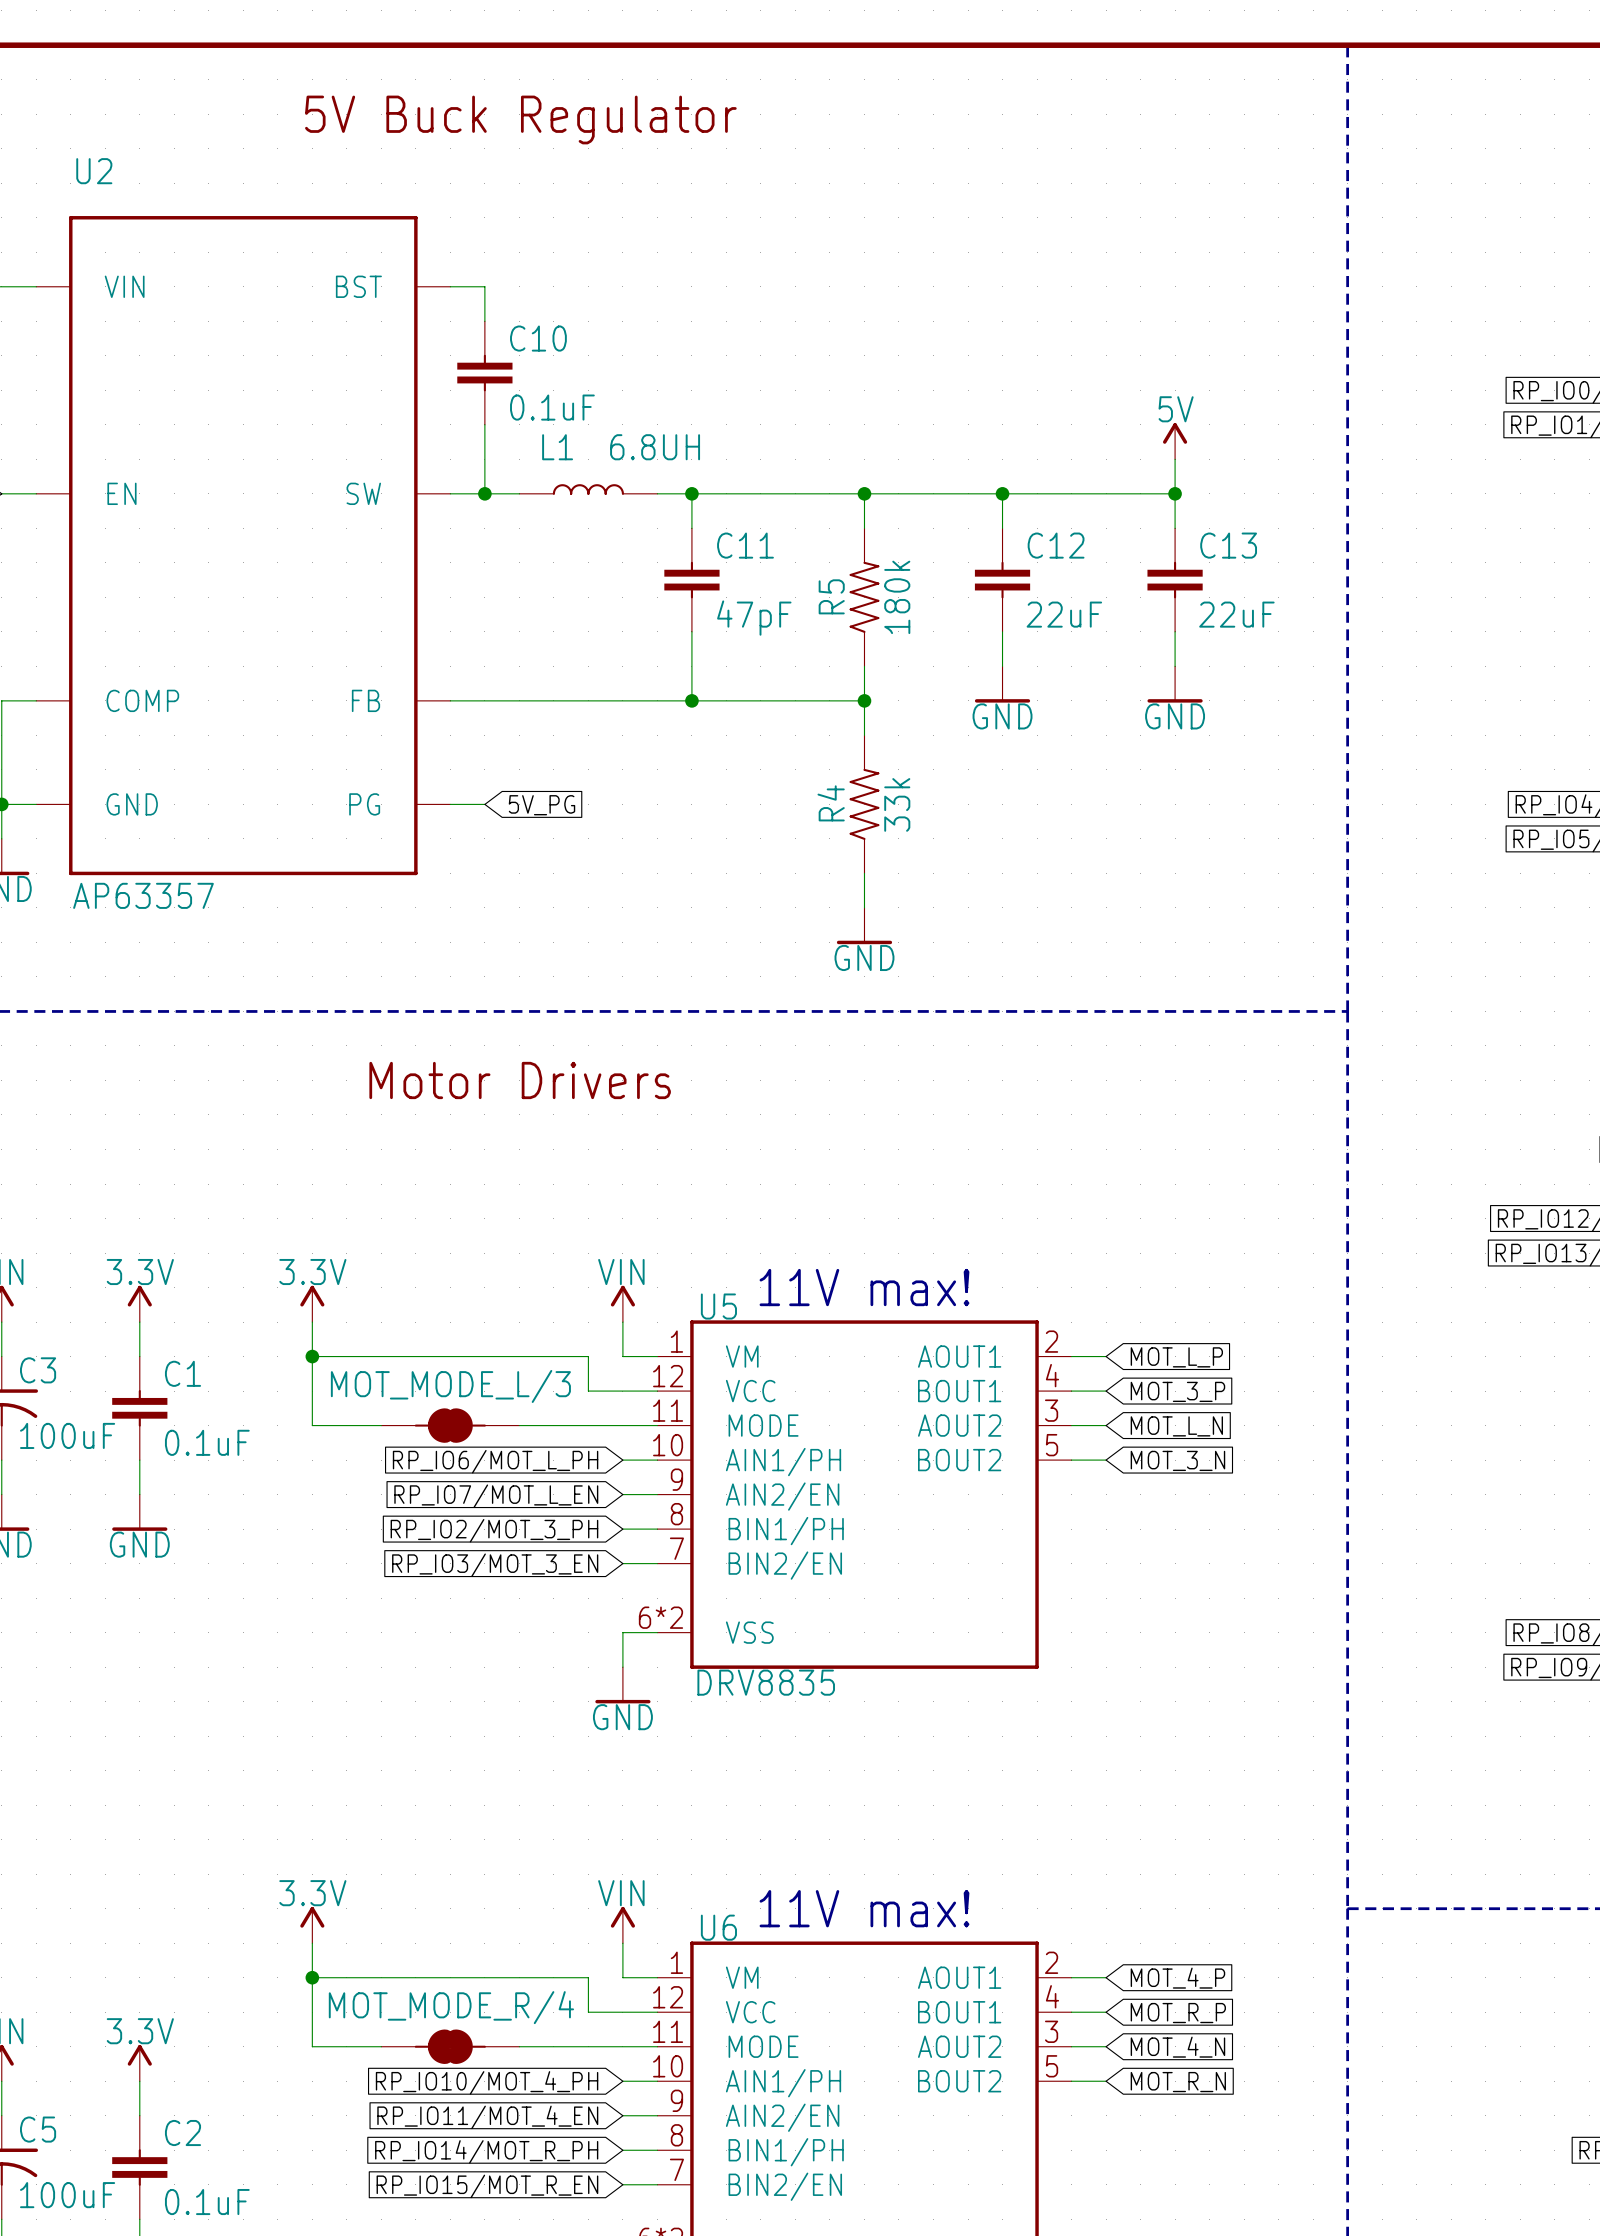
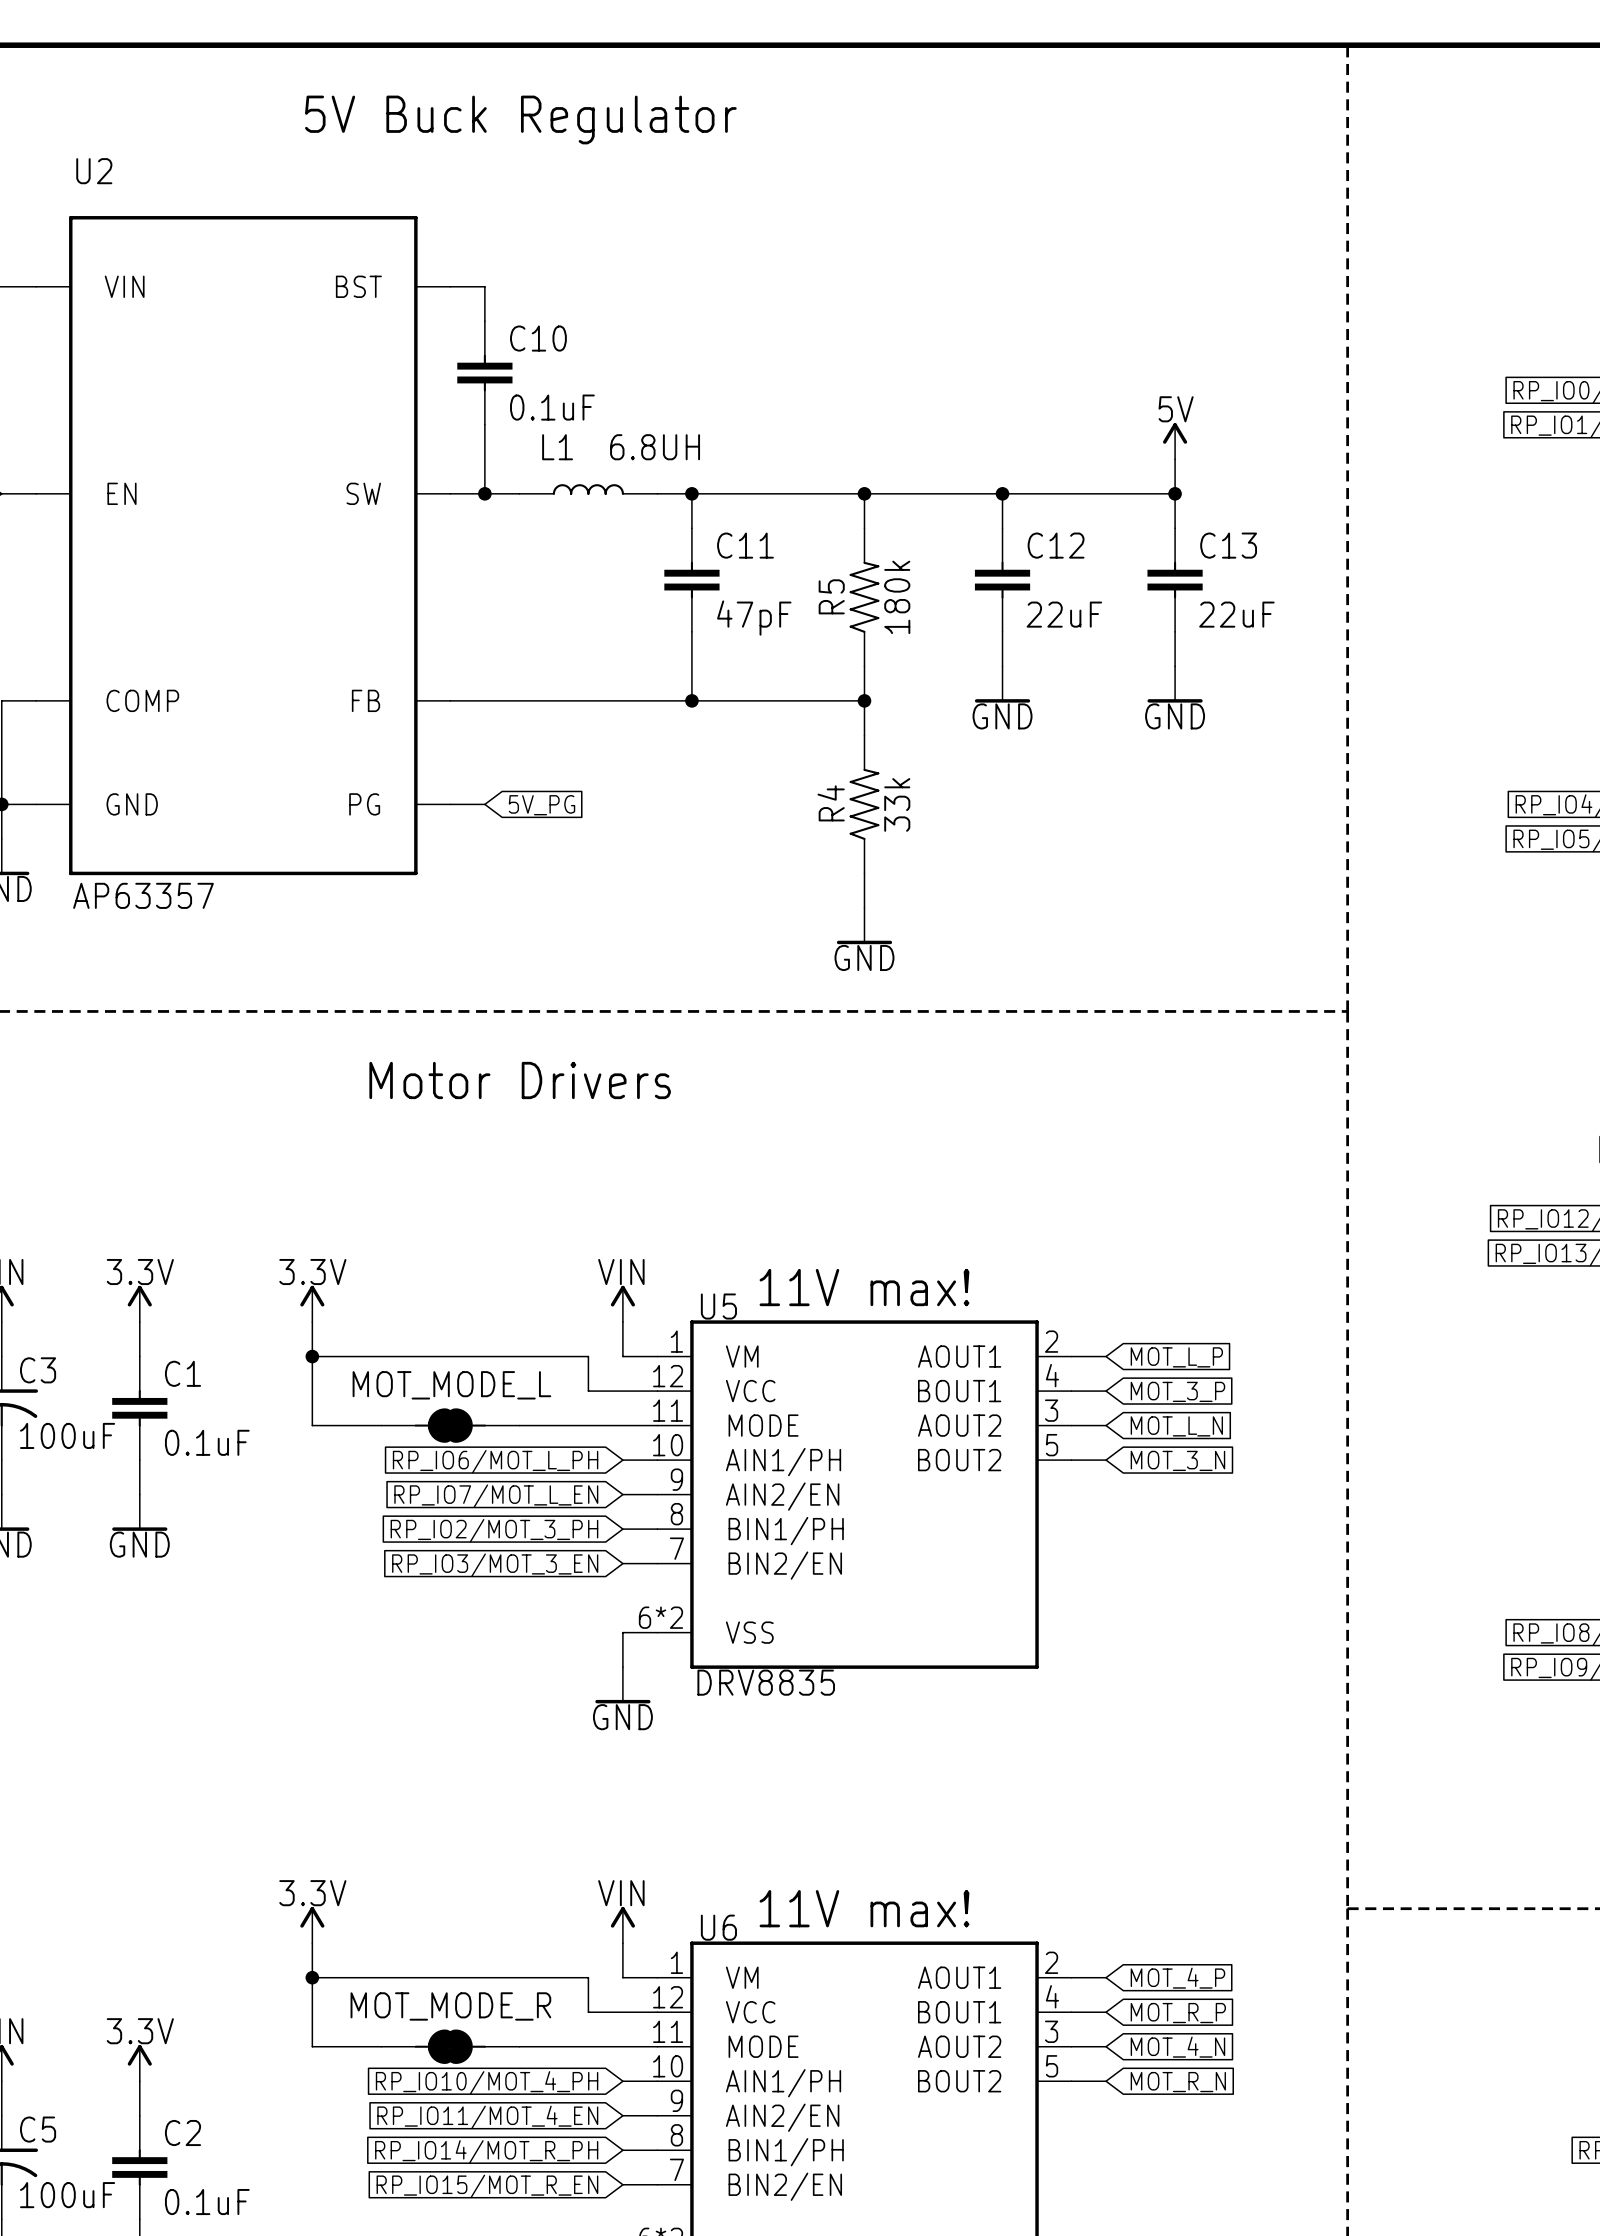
MOT_MODE_L/3 name: MOT_MODE_L/3 (450, 1386) -> MOT_MODE_L (451, 1385)
MOT_MODE_R/4 name: MOT_MODE_R/4 (451, 2007) -> MOT_MODE_R (450, 2006)

